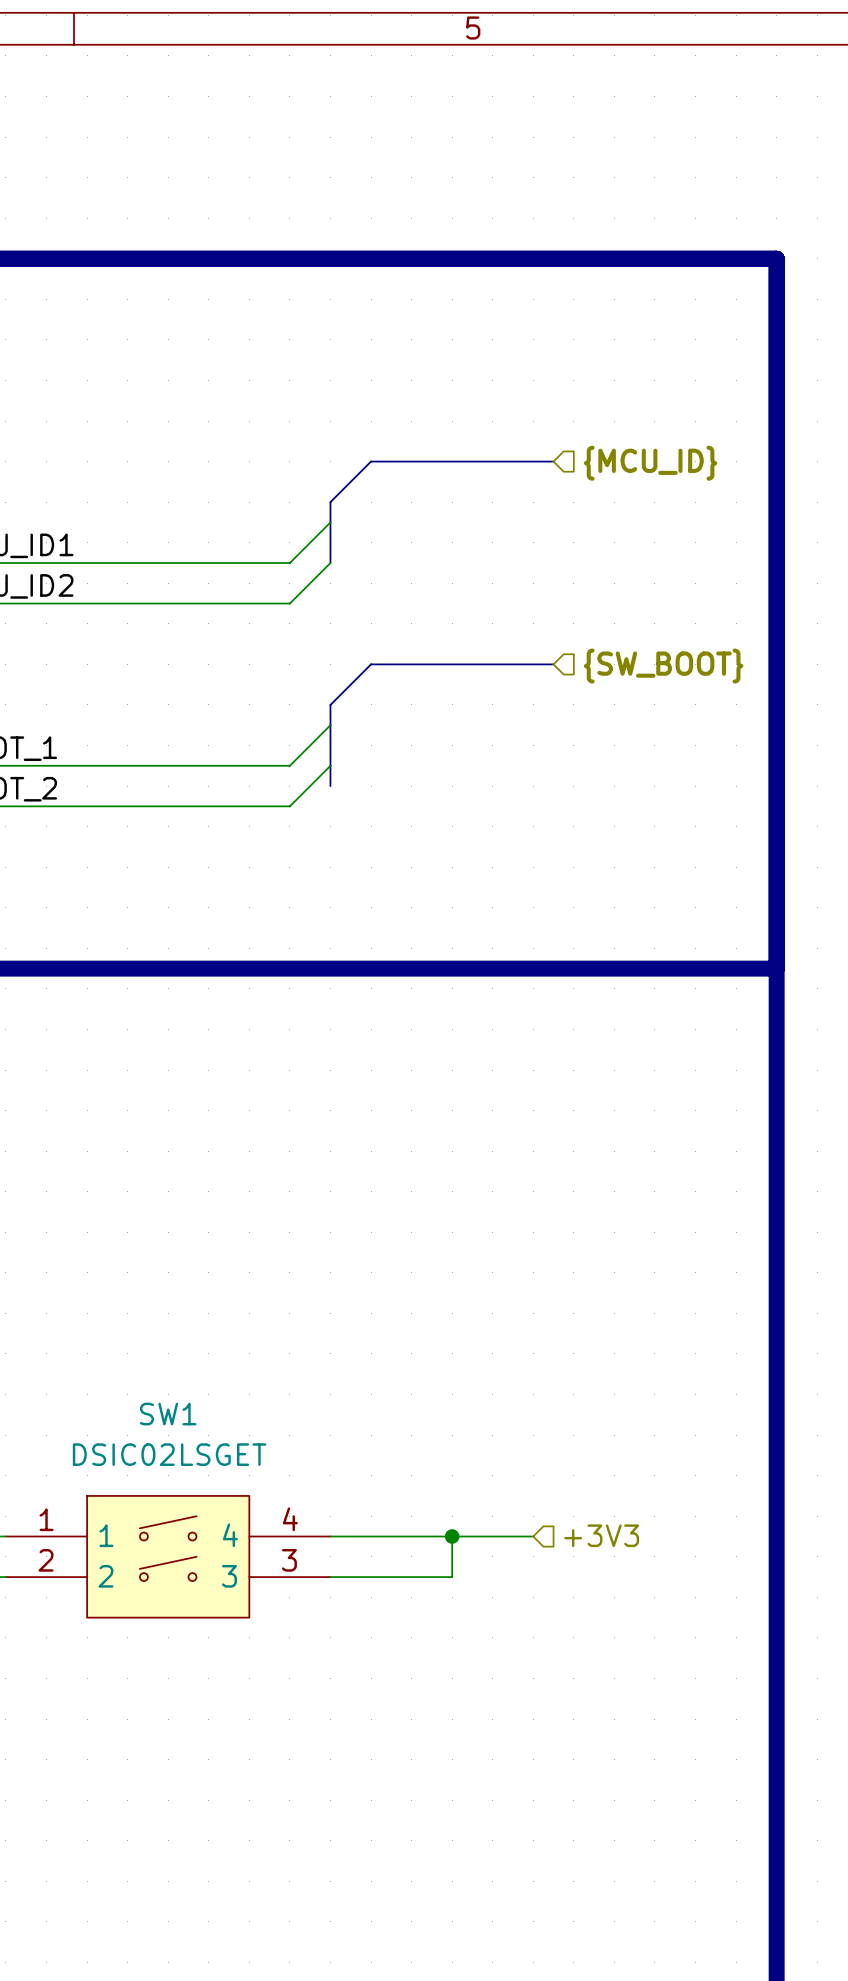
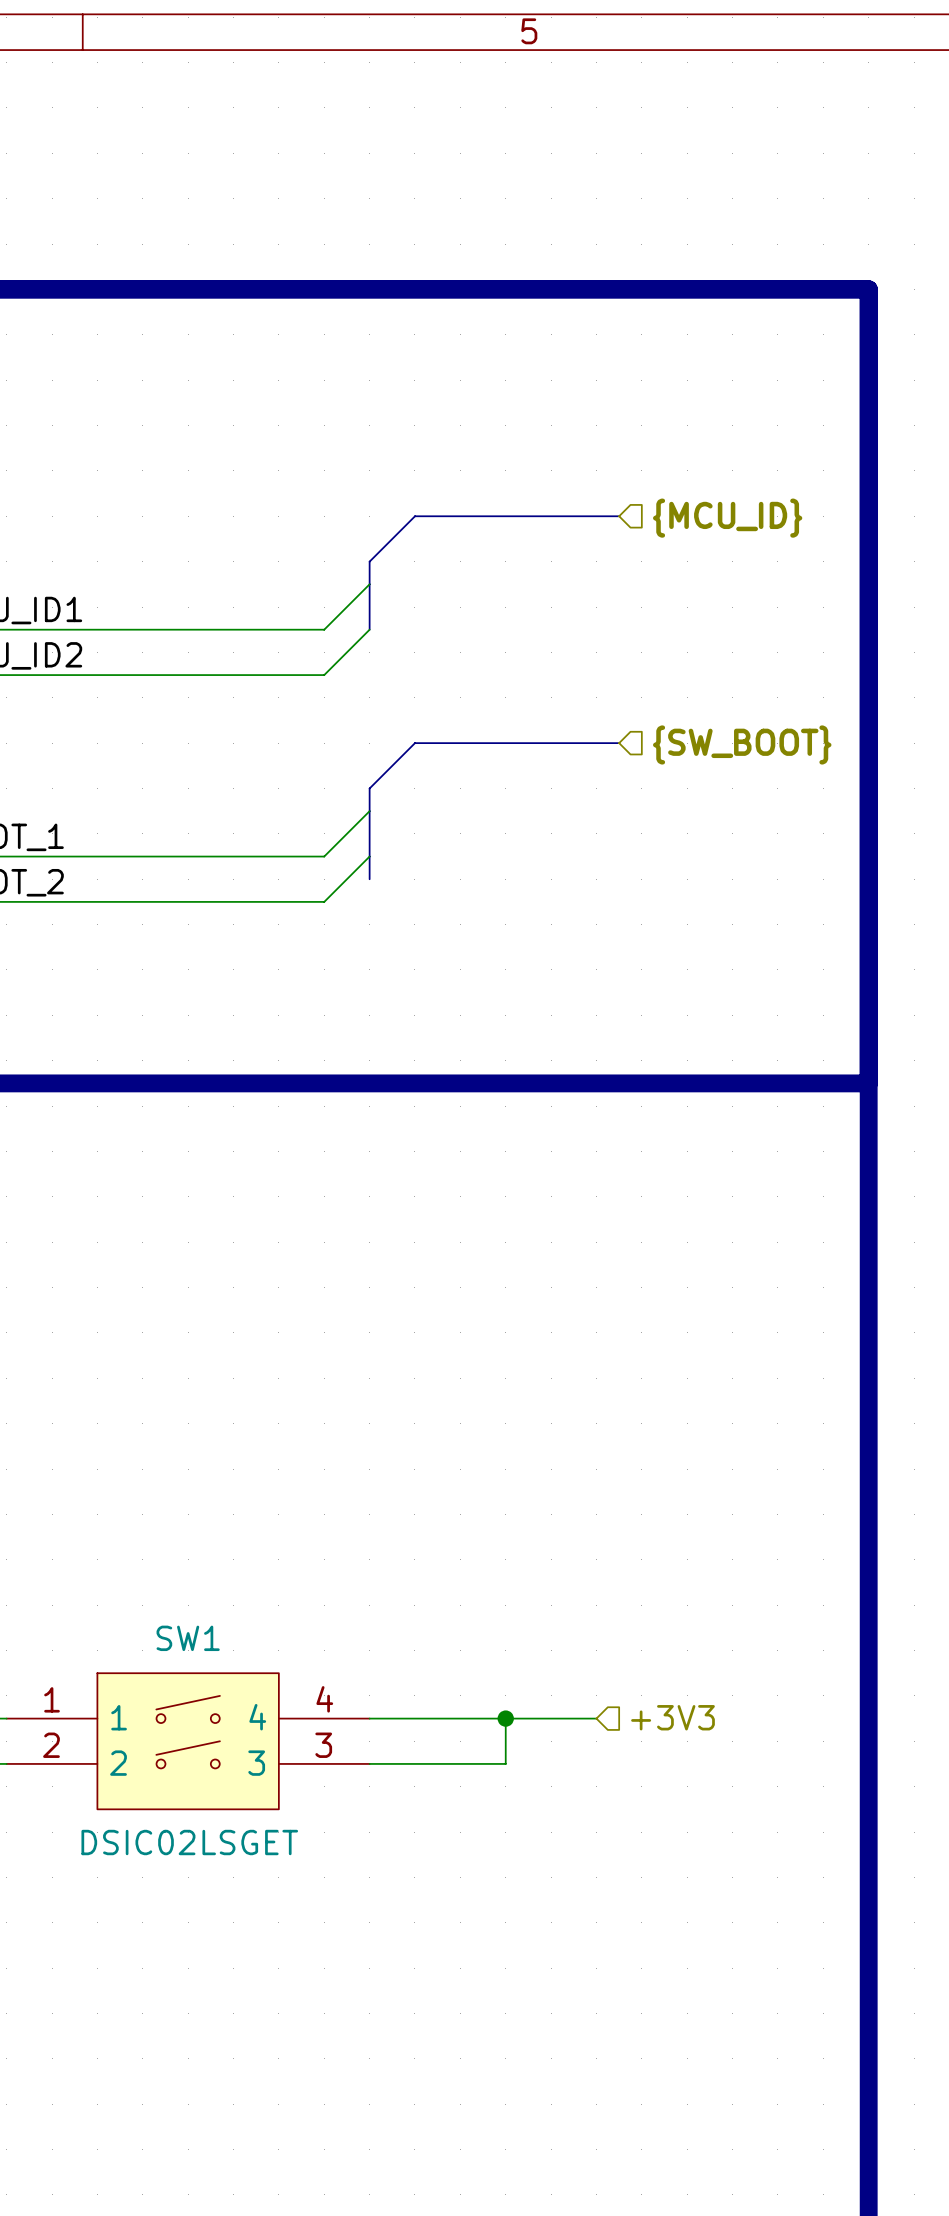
SW1 name position: SW1 (168, 1414) -> SW1 (188, 1638)
SW1 value position: DSIC02LSGET (169, 1454) -> DSIC02LSGET (189, 1842)

